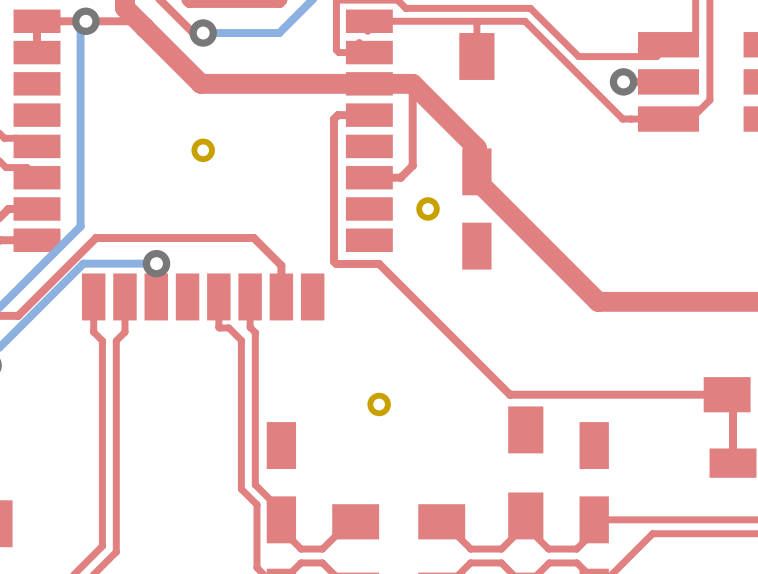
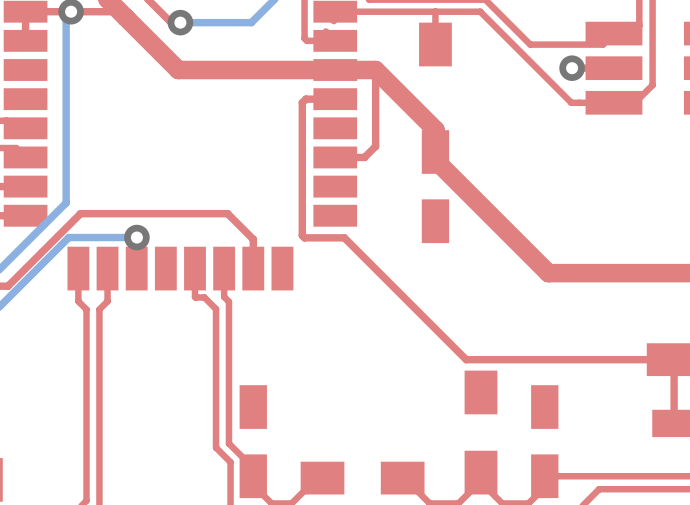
part: (203, 150) -> none
part: (428, 208) -> none
part: (379, 404) -> none

